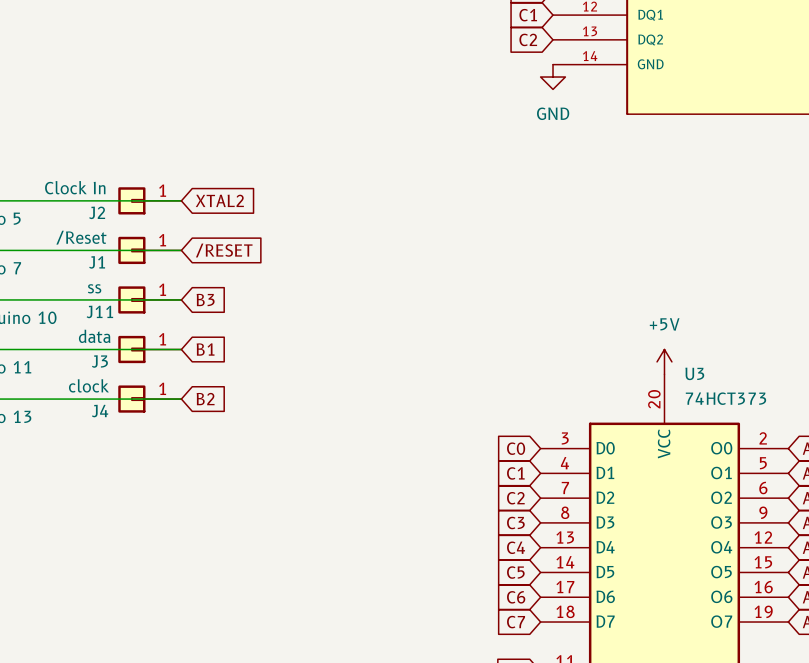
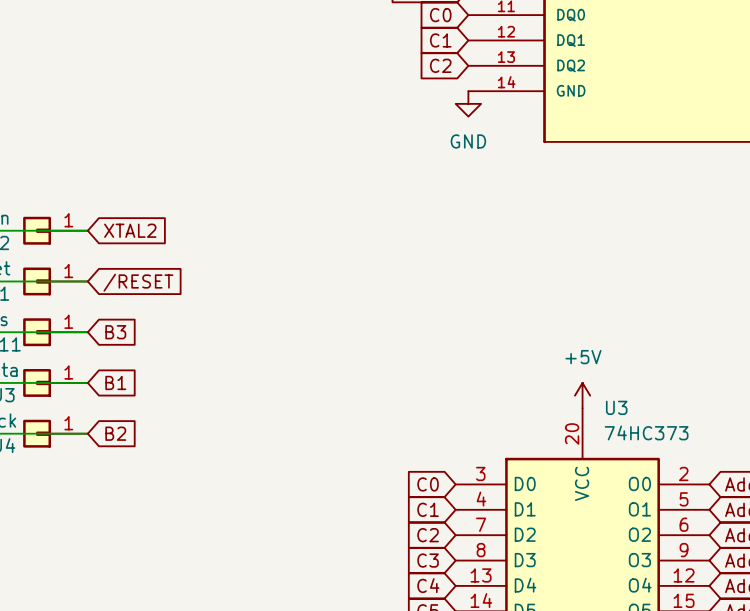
U3 value: 74HCT373 (725, 398) -> 74HC373 (646, 432)

